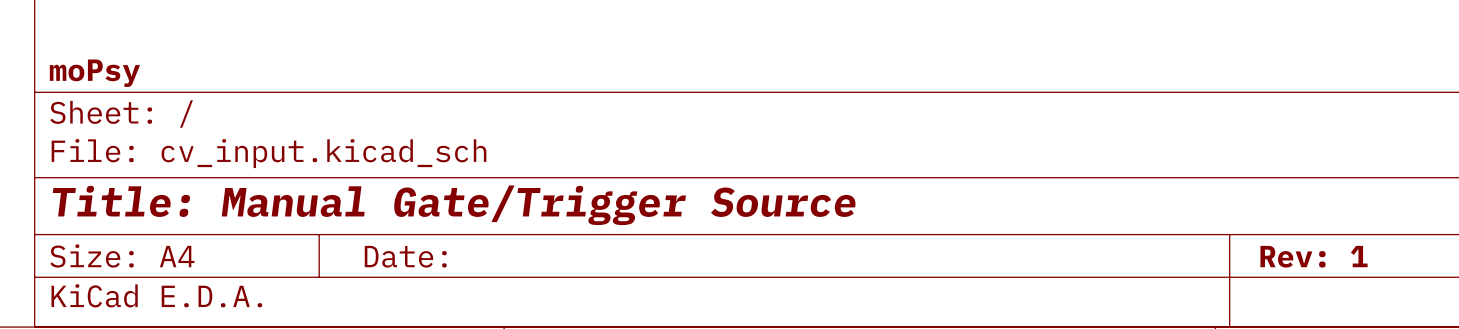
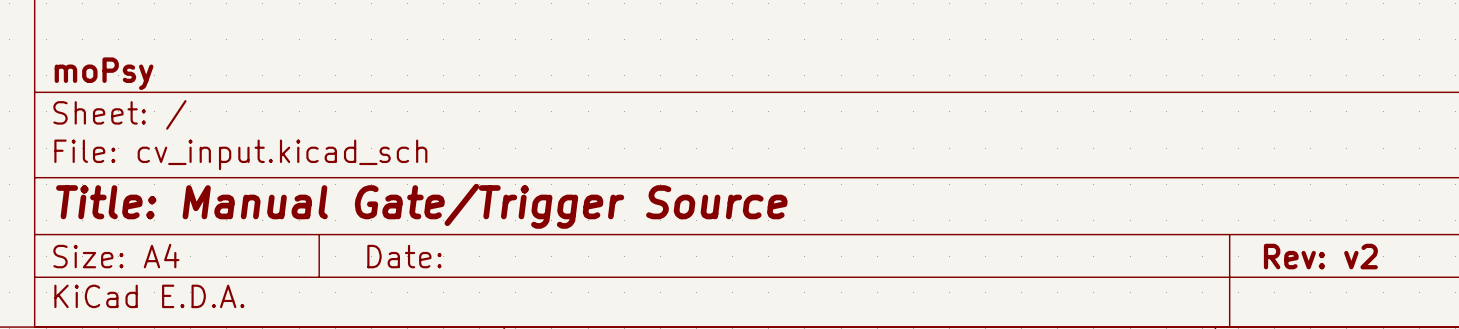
title block: Rev: 1 (1314, 256) -> Rev: v2 (1320, 256)

